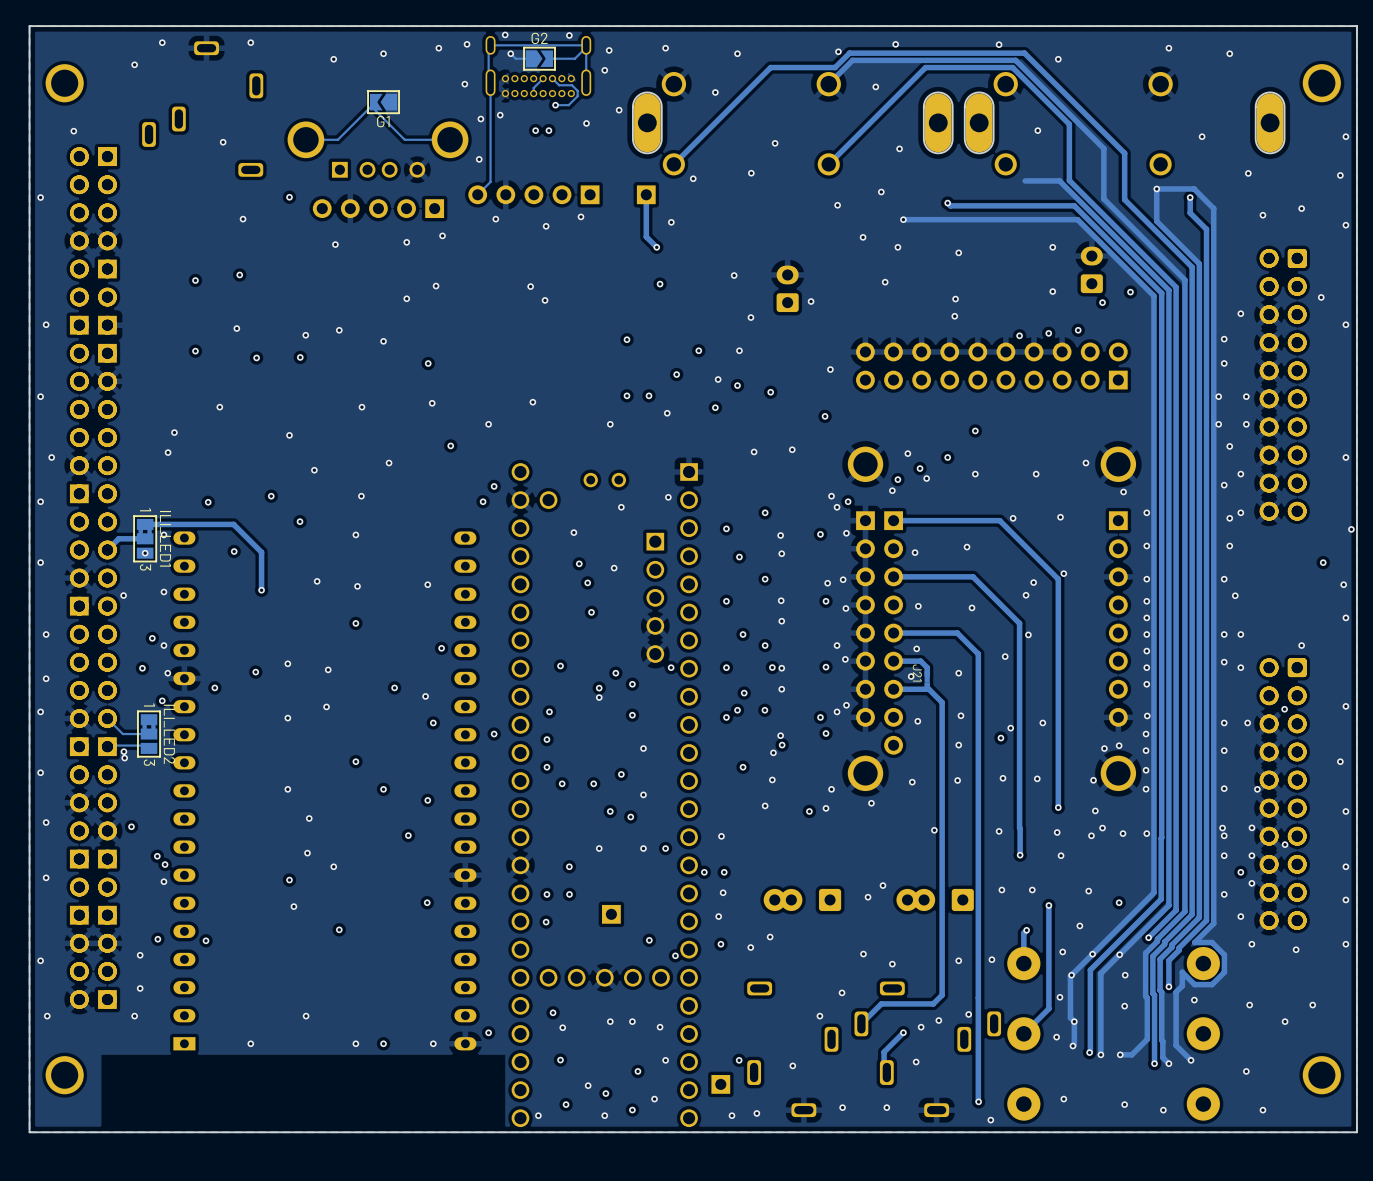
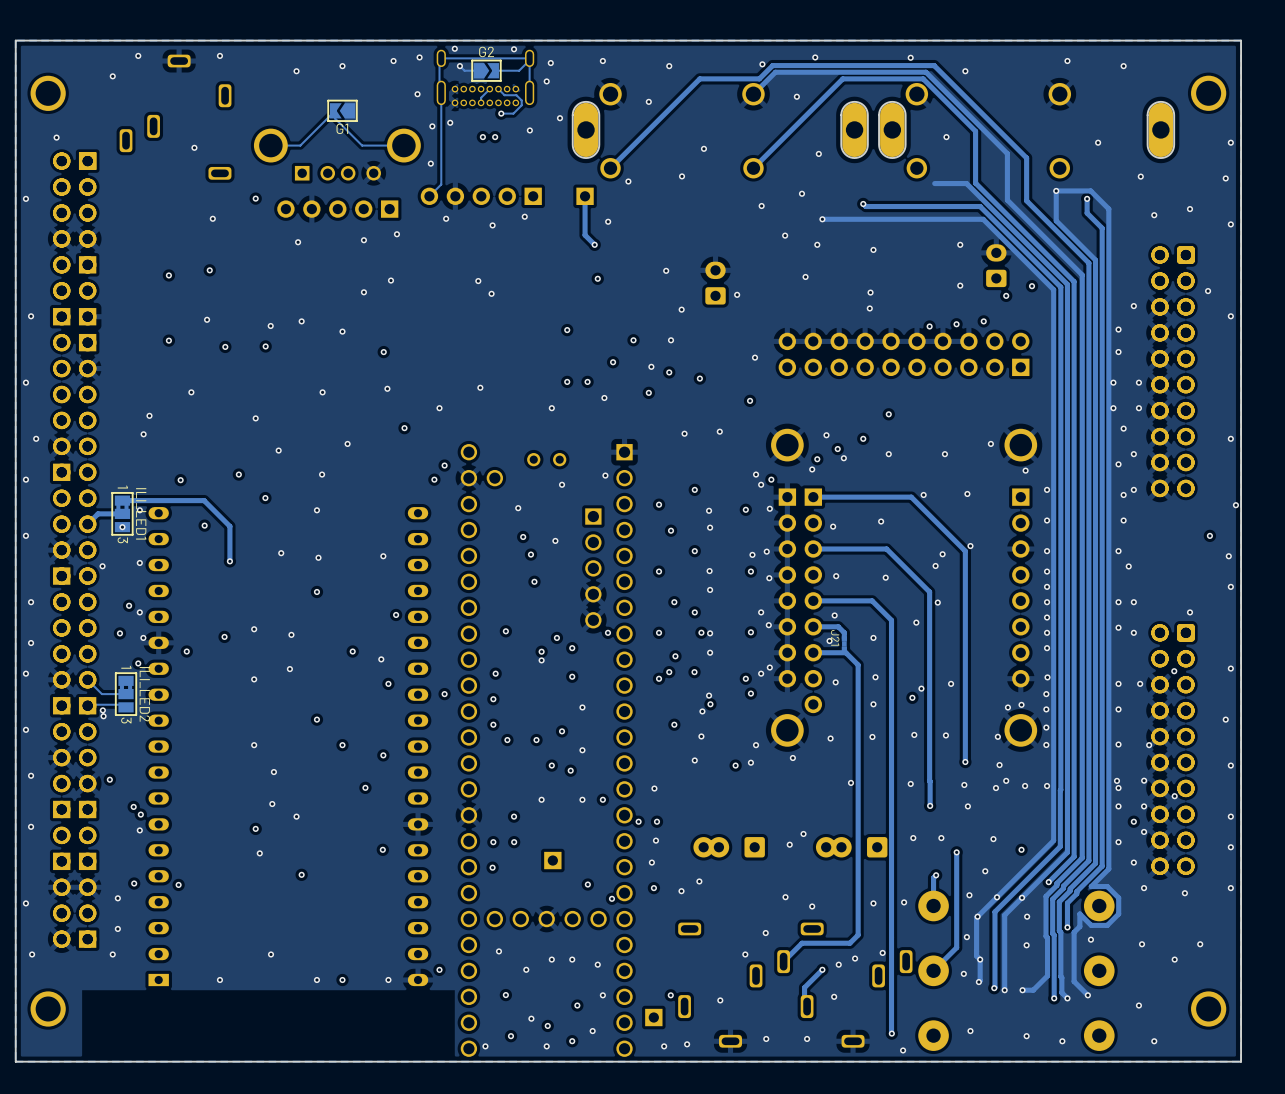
via position: (562, 1027) -> (526, 969)

